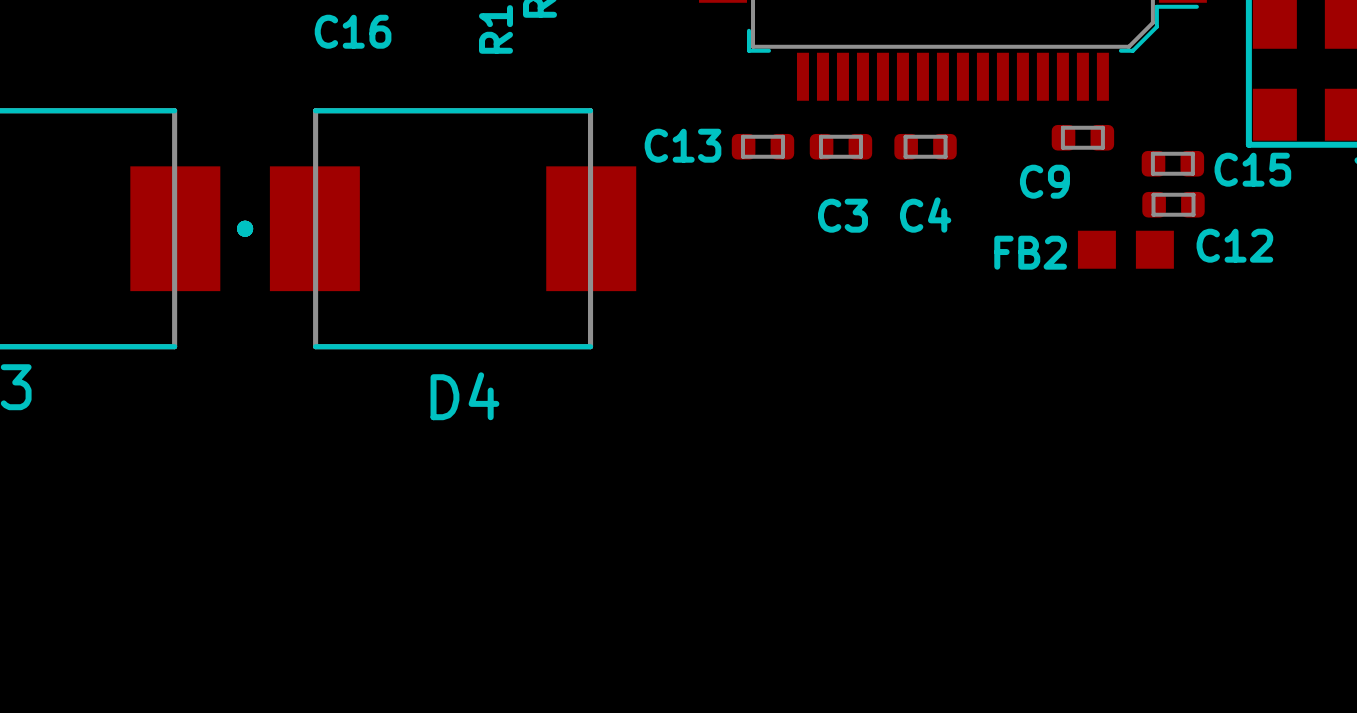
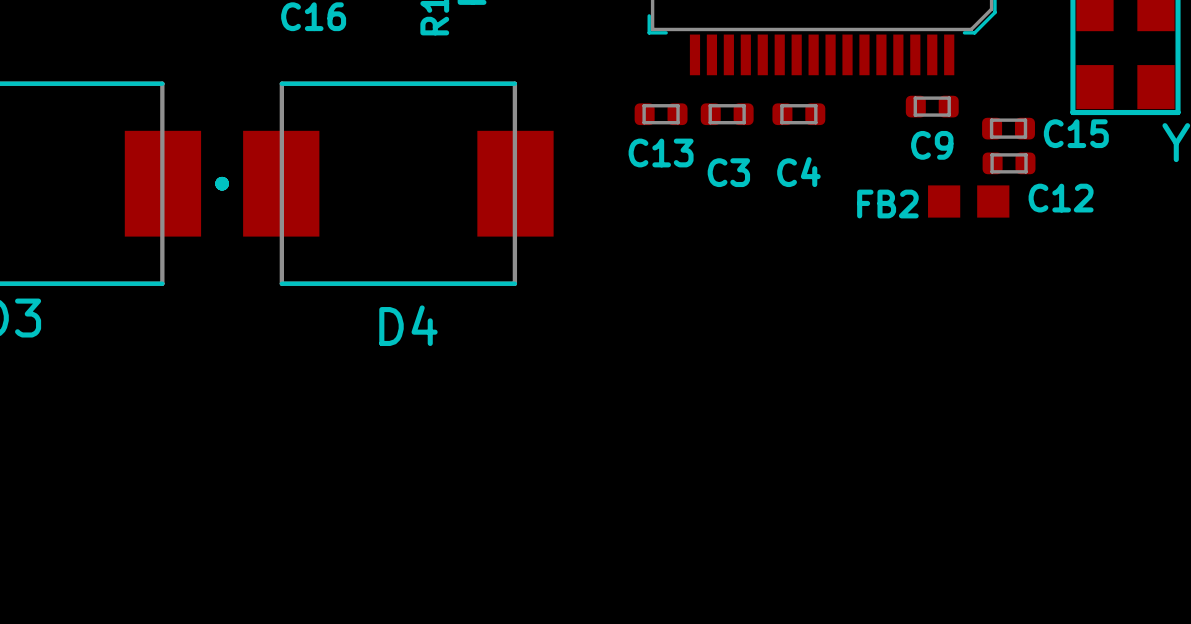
C13 name position: C13 (683, 145) -> C13 (661, 152)
C9 name position: C9 (1044, 181) -> C9 (932, 145)

